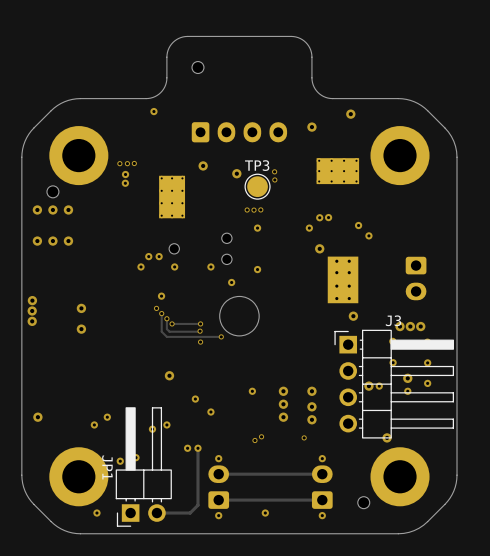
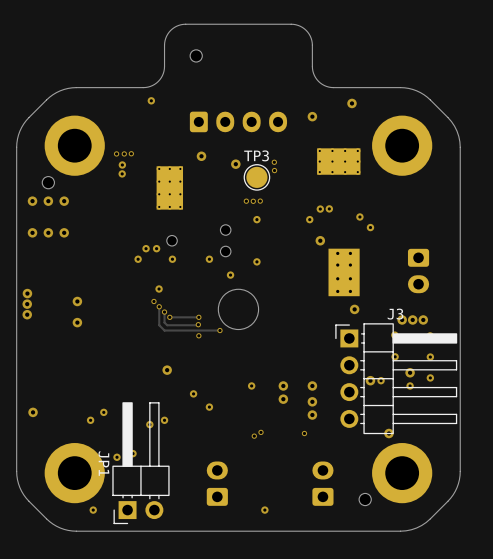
via: (283, 417) -> none
via: (187, 448) -> none
track: (197, 448) (197, 505) (190, 513) (156, 513) -> none
via: (197, 448) -> none
via: (218, 458) -> none
via: (322, 458) -> none
track: (322, 474) (218, 474) -> none
track: (322, 500) (218, 500) -> none
via: (218, 515) -> none
via: (322, 515) -> none

